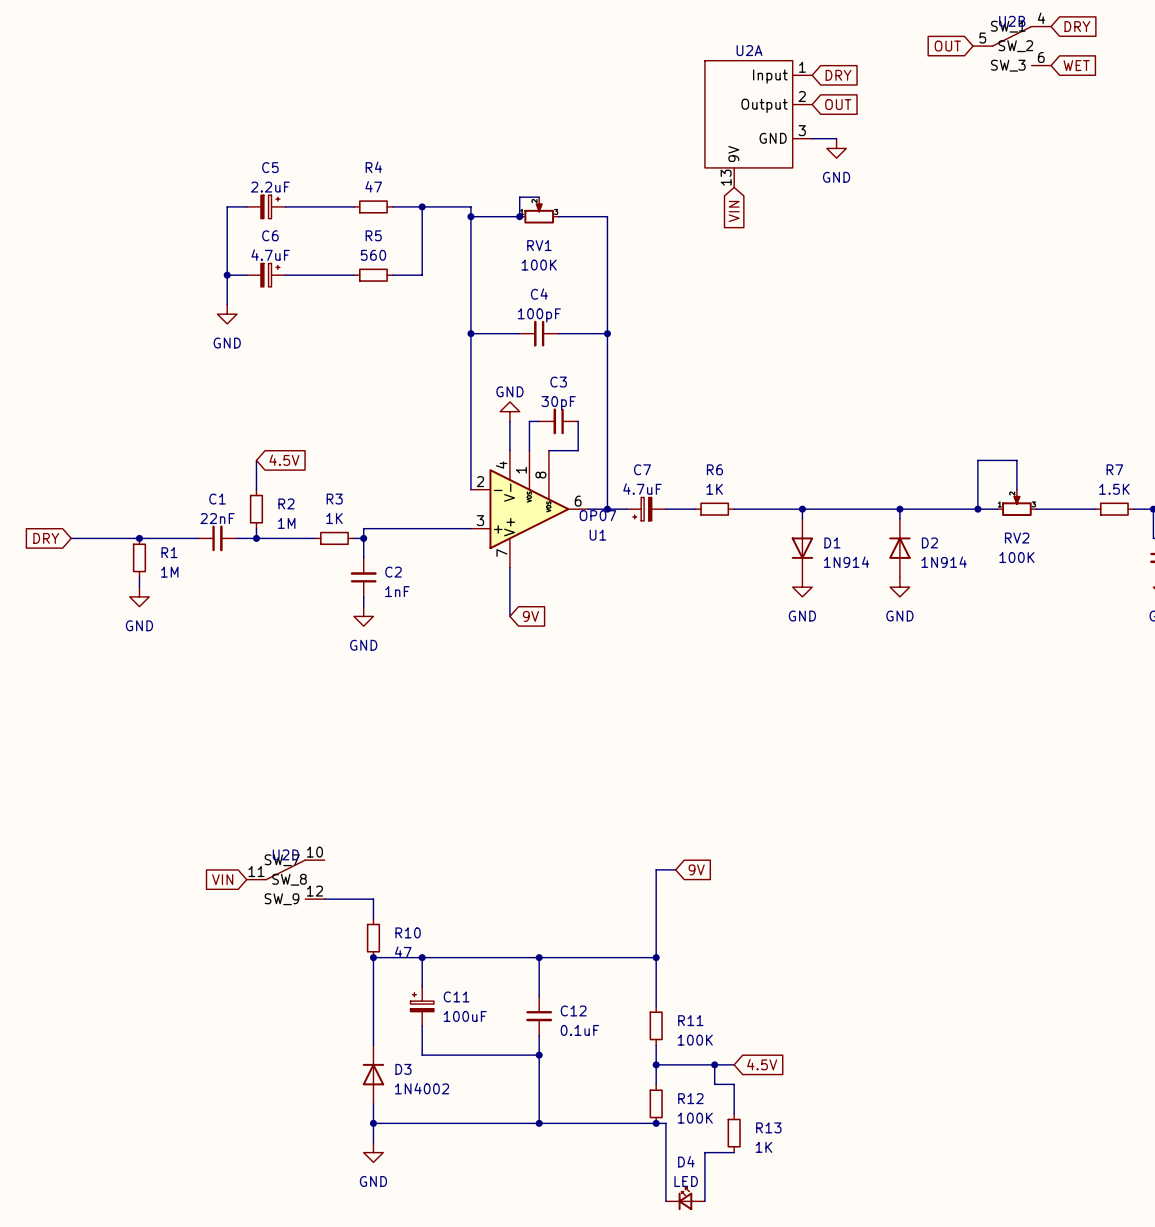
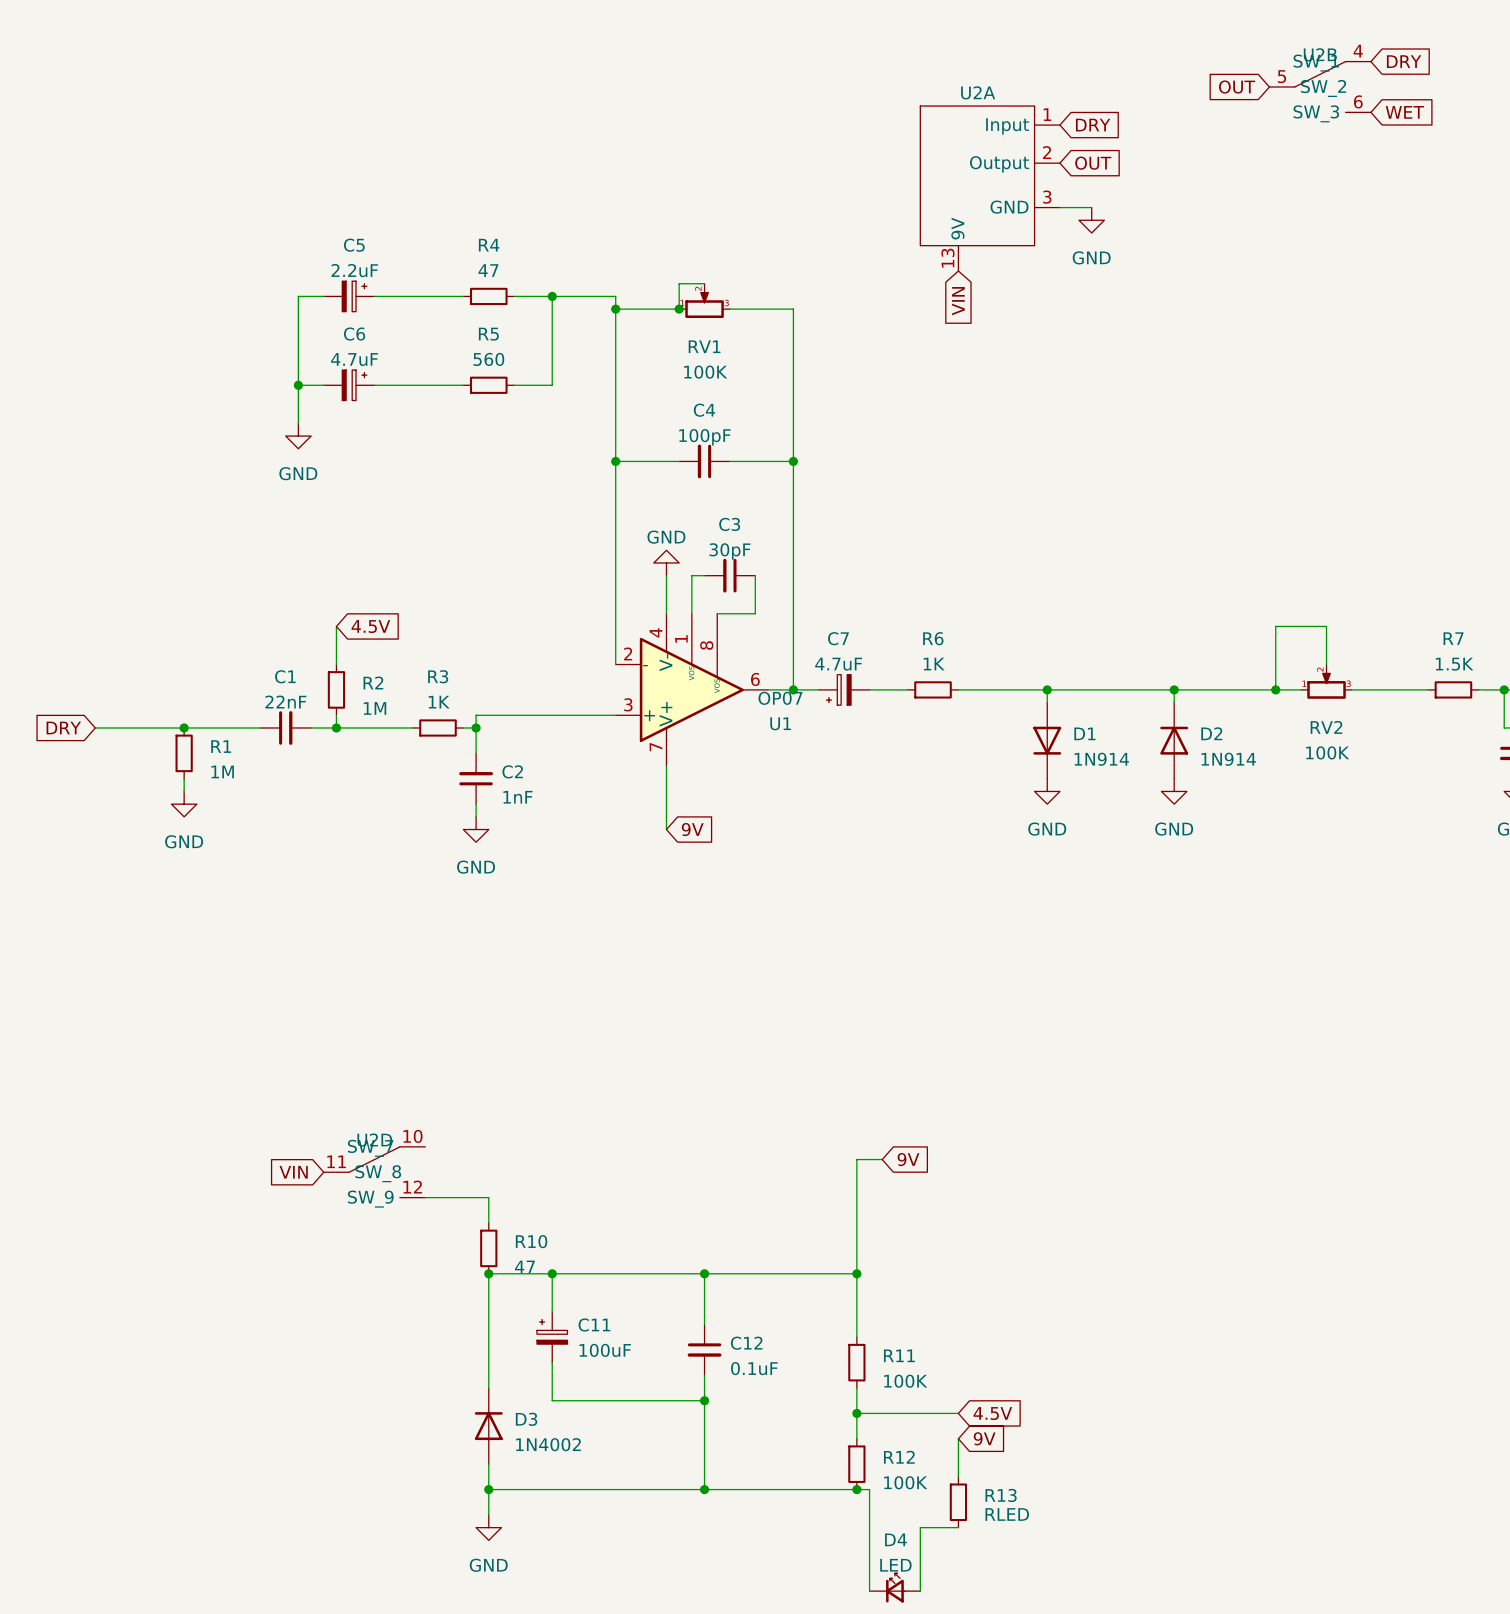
wire: (714, 1064) (714, 1084) (734, 1084) -> none
junction: (714, 1064) -> none
global label: none -> 9V (984, 1438)
R13 value: 1K (763, 1147) -> RLED (1007, 1514)

